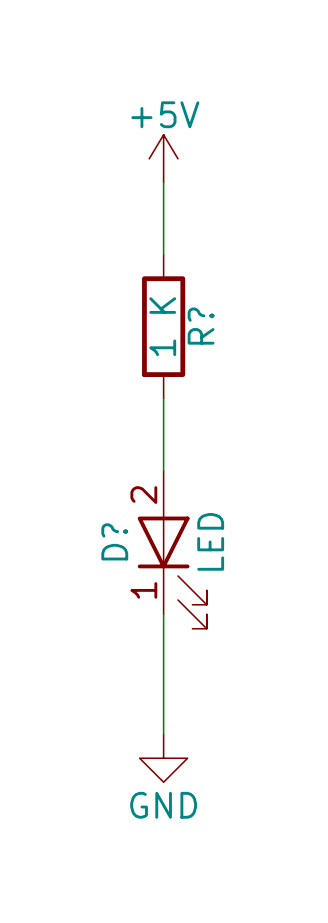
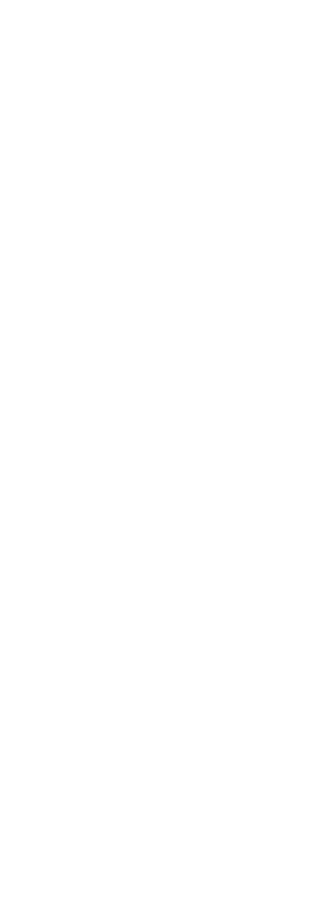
power symbol: +5V (163, 158) -> none
wire: (163, 182) (163, 254) -> none
R?: 1 K (163, 326) -> none
wire: (163, 398) (163, 470) -> none
D?: LED (172, 549) -> none
wire: (163, 614) (163, 734) -> none
power symbol: GND (163, 758) -> none

